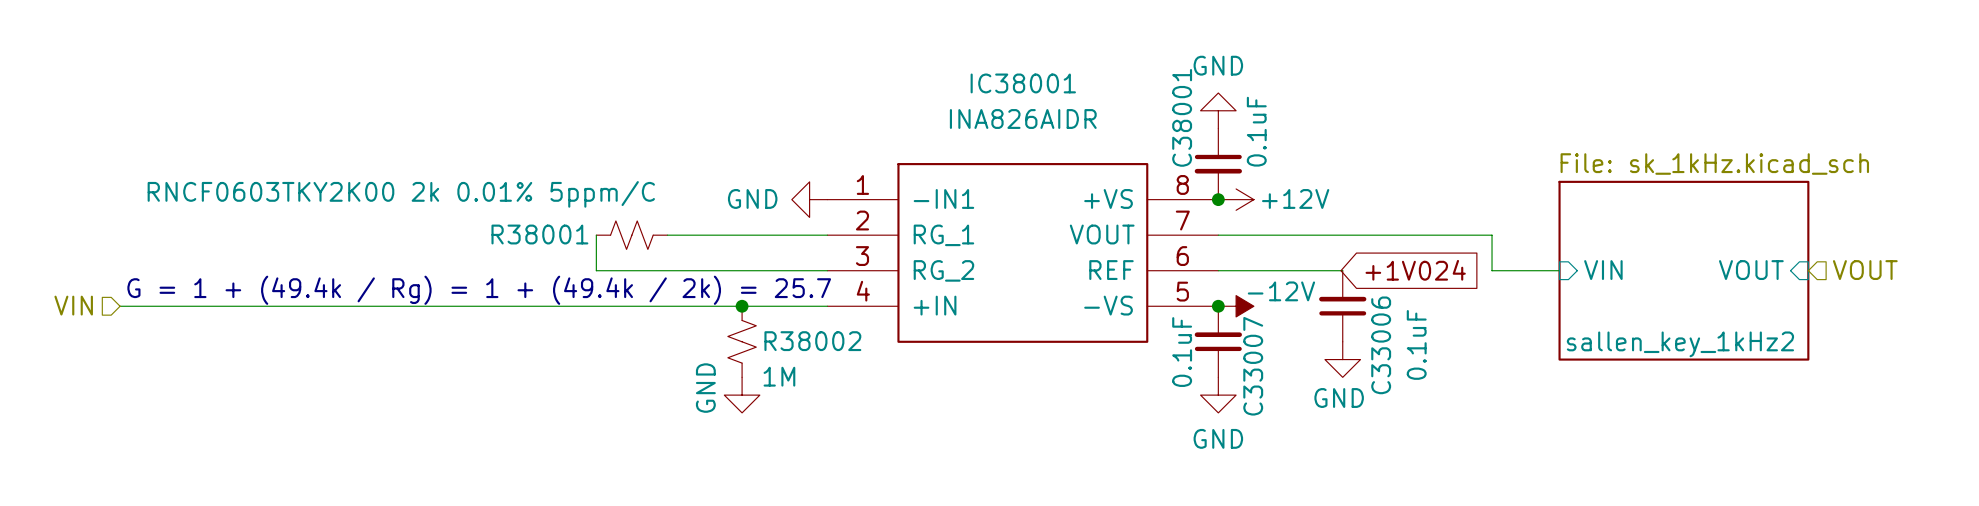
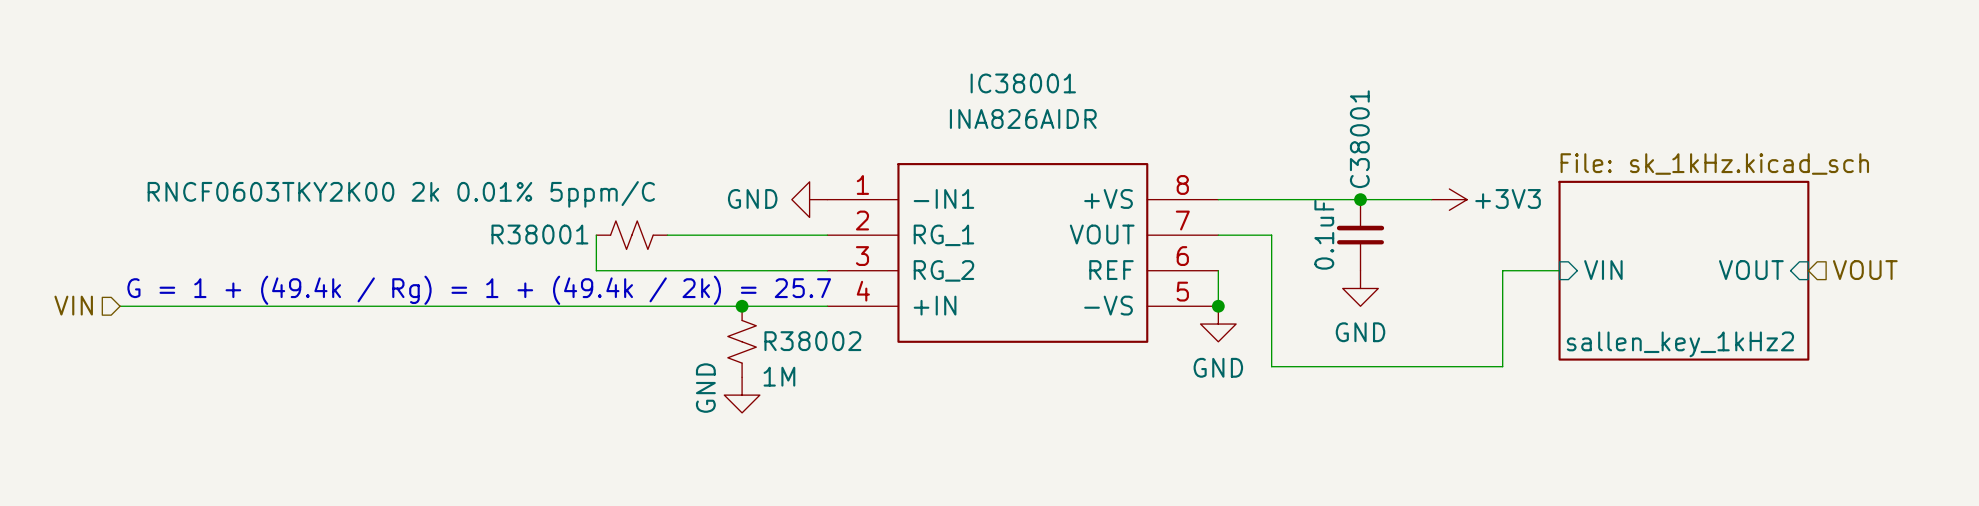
power symbol: GND (1218, 110) -> none
C38001 name position: C38001 (1182, 117) -> C38001 (1359, 139)
C38001 value position: 0.1uF (1256, 131) -> 0.1uF (1324, 234)
C38001 rotation: 0° (1218, 164) -> 180° (1360, 235)
C38001 position: (1218, 164) -> (1360, 235)
wire: none -> (1218, 199) (1431, 199)
junction: (1218, 199) -> none
power symbol: +12V (1236, 199) -> none
junction: none -> (1360, 199)
power symbol: none -> +3V3 (1449, 199)
wire: (1271, 235) (1492, 235) (1492, 270) (1502, 270) -> (1271, 235) (1271, 366) (1502, 366) (1502, 270)
wire: (1218, 270) (1342, 270) -> (1218, 270) (1218, 306)
global label: +1V024 (1415, 270) -> none
power symbol: none -> GND (1360, 288)
power symbol: -12V (1236, 306) -> none
C33006: 0.1uF (1342, 306) -> none
power symbol: none -> GND (1218, 324)
C33007: 0.1uF (1218, 341) -> none
power symbol: GND (1342, 359) -> none
power symbol: GND (1218, 395) -> none

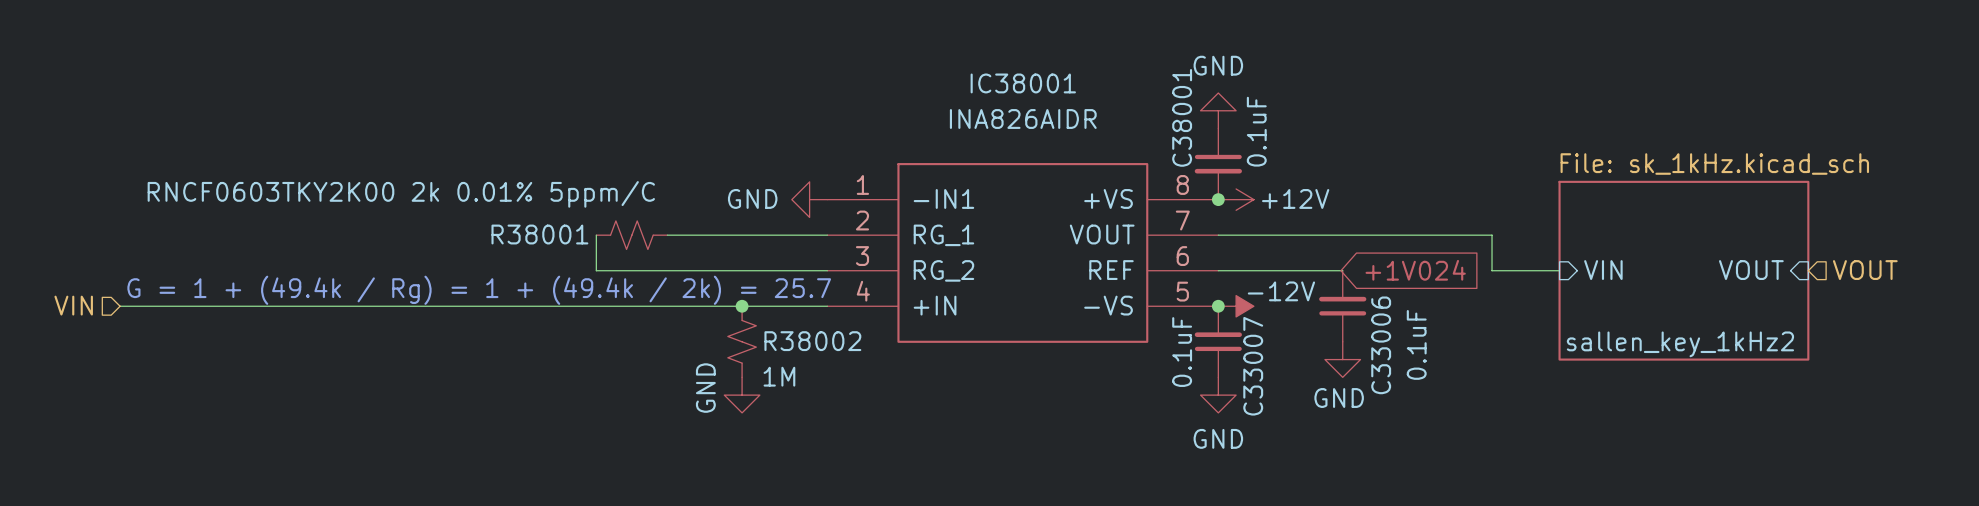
power symbol: none -> GND (1218, 110)
C38001 name position: C38001 (1359, 139) -> C38001 (1182, 117)
wire: (1218, 199) (1431, 199) -> none
junction: none -> (1218, 199)
power symbol: none -> +12V (1236, 199)
junction: (1360, 199) -> none
power symbol: +3V3 (1449, 199) -> none
C38001 value position: 0.1uF (1324, 234) -> 0.1uF (1256, 131)
wire: (1271, 235) (1271, 366) (1502, 366) (1502, 270) -> (1271, 235) (1492, 235) (1492, 270) (1502, 270)
C38001 rotation: 0° (1360, 235) -> 180° (1218, 164)
C38001 position: (1360, 235) -> (1218, 164)
wire: (1218, 270) (1218, 306) -> (1218, 270) (1342, 270)
global label: none -> +1V024 (1415, 270)
power symbol: GND (1360, 288) -> none
power symbol: none -> -12V (1236, 306)
C33006: none -> 0.1uF (1342, 306)
power symbol: GND (1218, 324) -> none
C33007: none -> 0.1uF (1218, 341)
power symbol: none -> GND (1342, 359)
power symbol: none -> GND (1218, 395)

